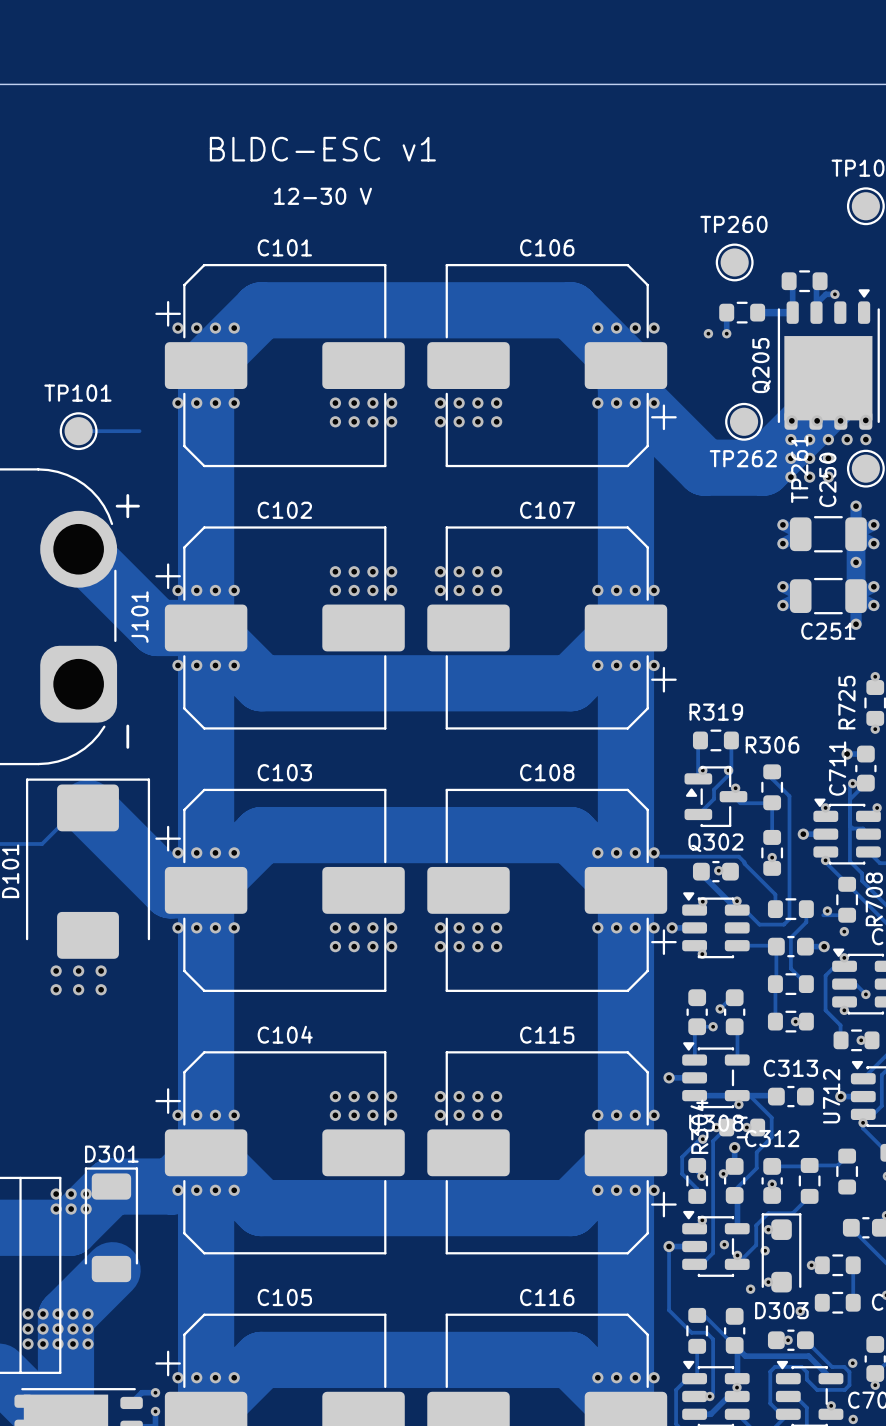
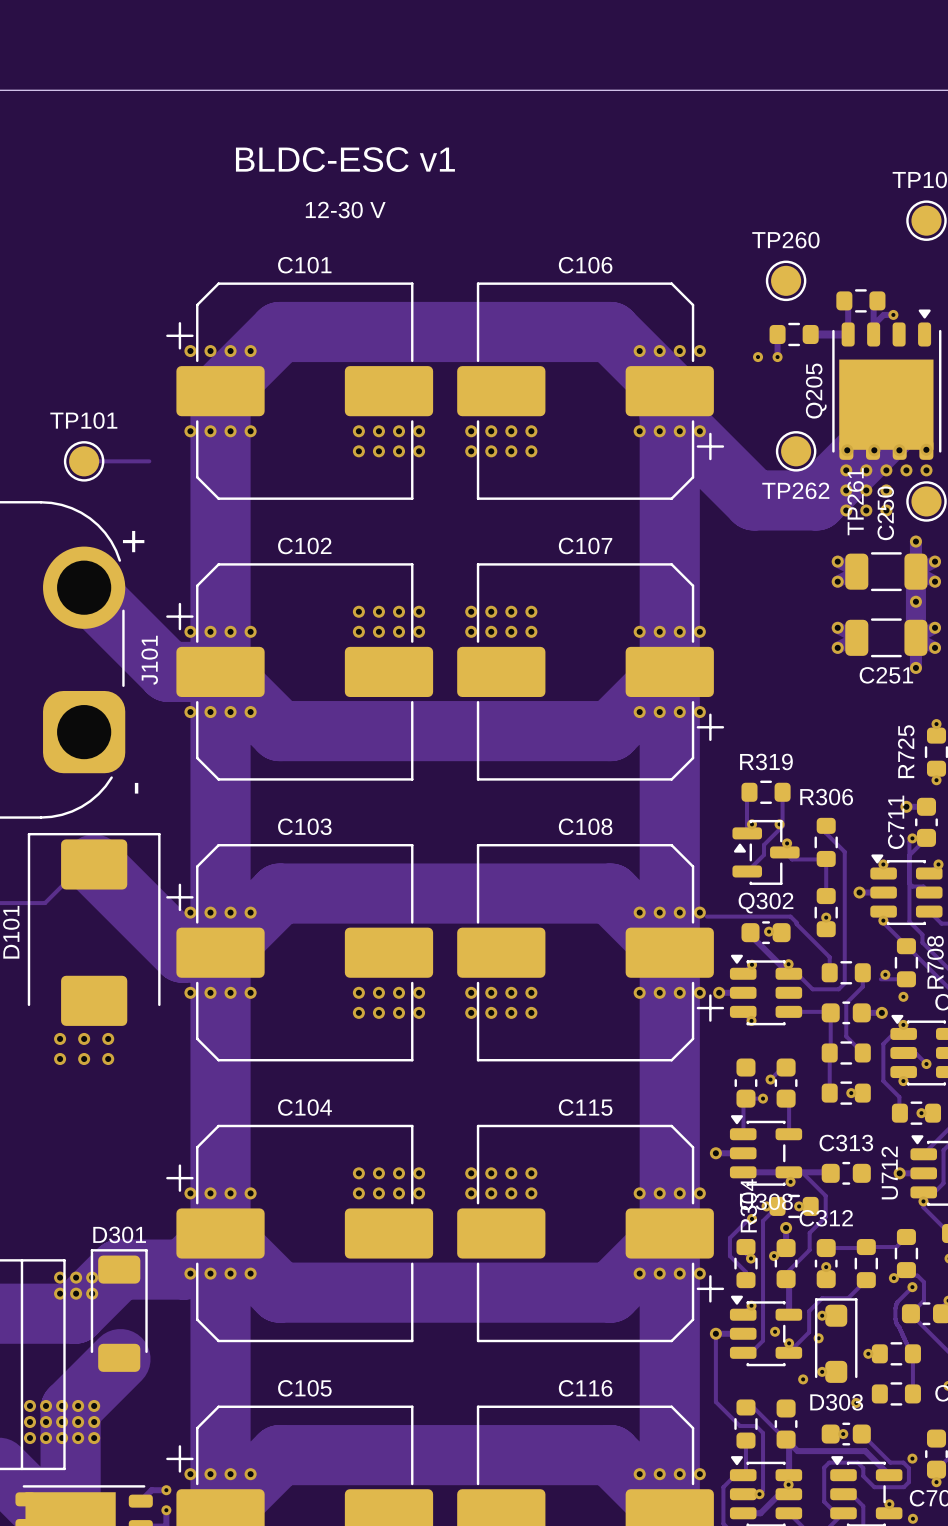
track: none -> (906, 1270) (911, 1275) (917, 1275) (923, 1282) (923, 1300) (910, 1313)
via: none -> (893, 1278)
track: none -> (912, 1287) (897, 1302) (895, 1308) (895, 1322) (907, 1345)
via: none -> (912, 1287)

